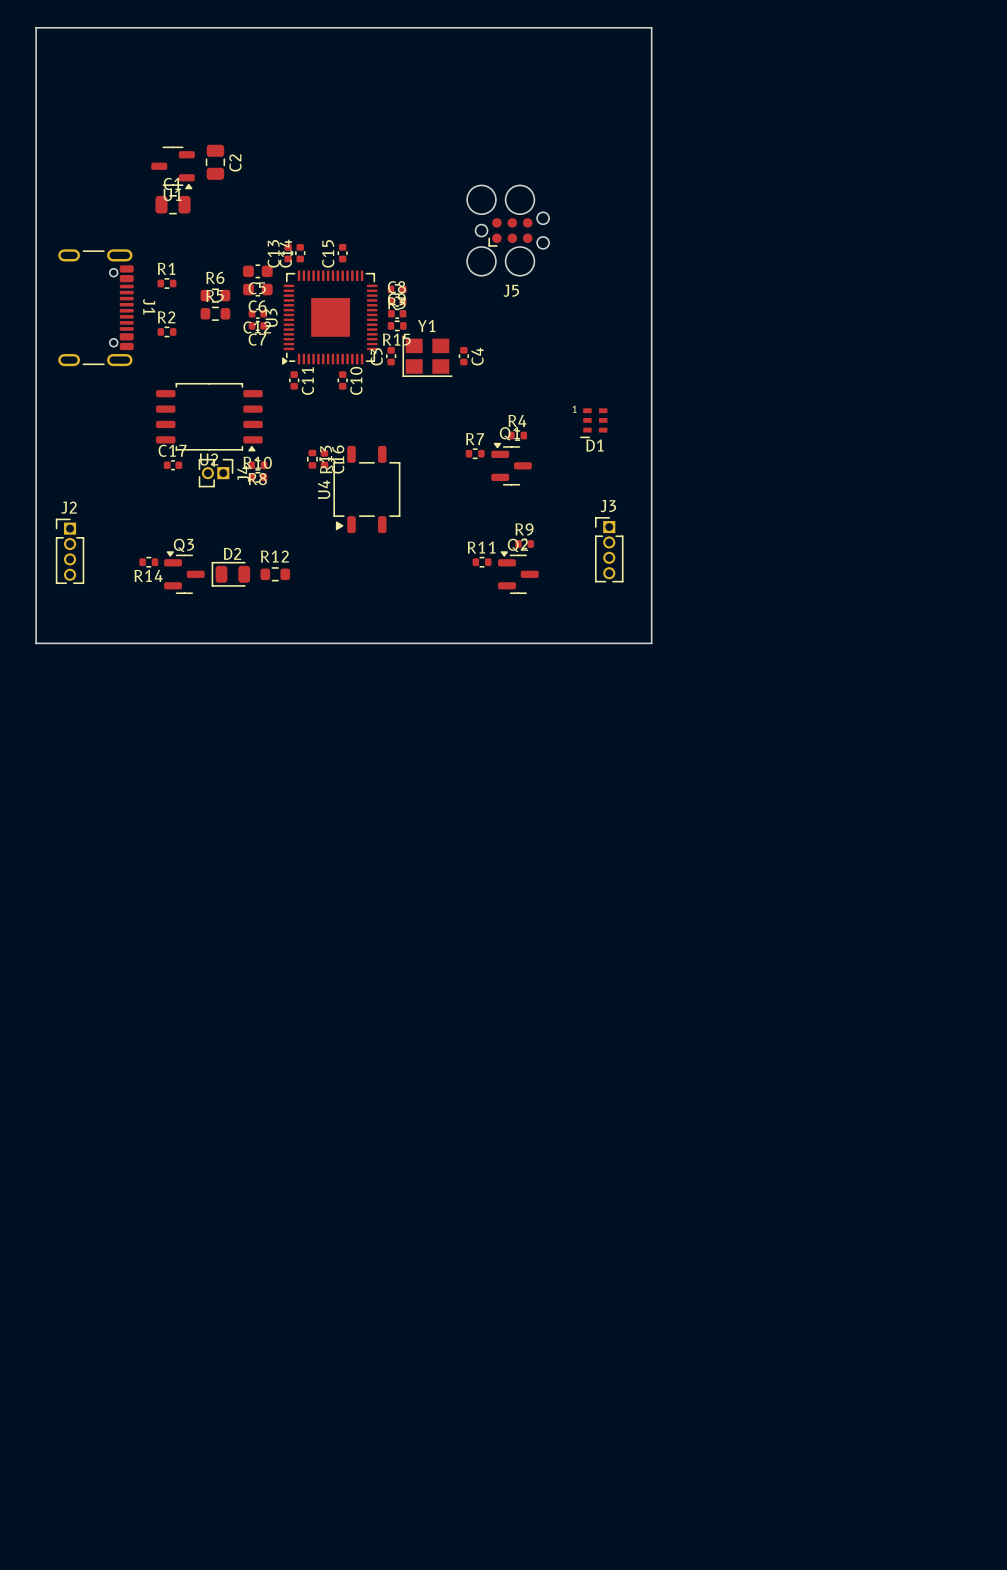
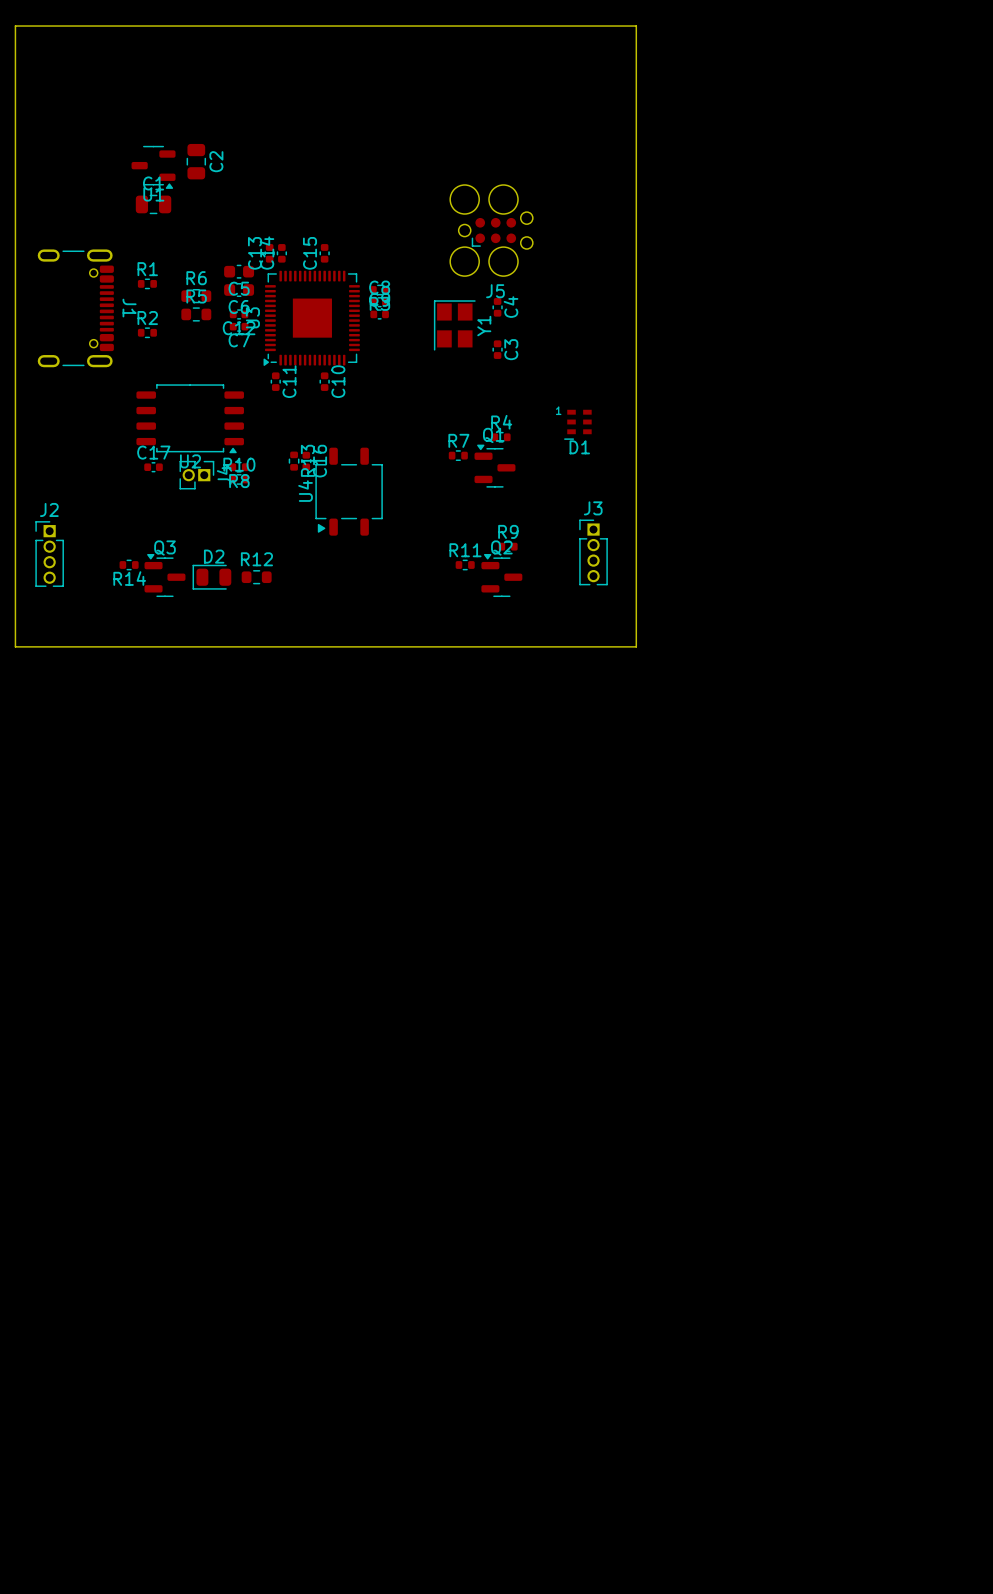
R15: (397, 325) -> none
C3 name position: C3 (376, 356) -> C3 (511, 349)
C3 position: (391, 356) -> (497, 349)
Y1 rotation: 0° (427, 356) -> 90° clockwise (454, 325)
Y1 position: (427, 356) -> (454, 325)
C4 position: (463, 356) -> (497, 307)

